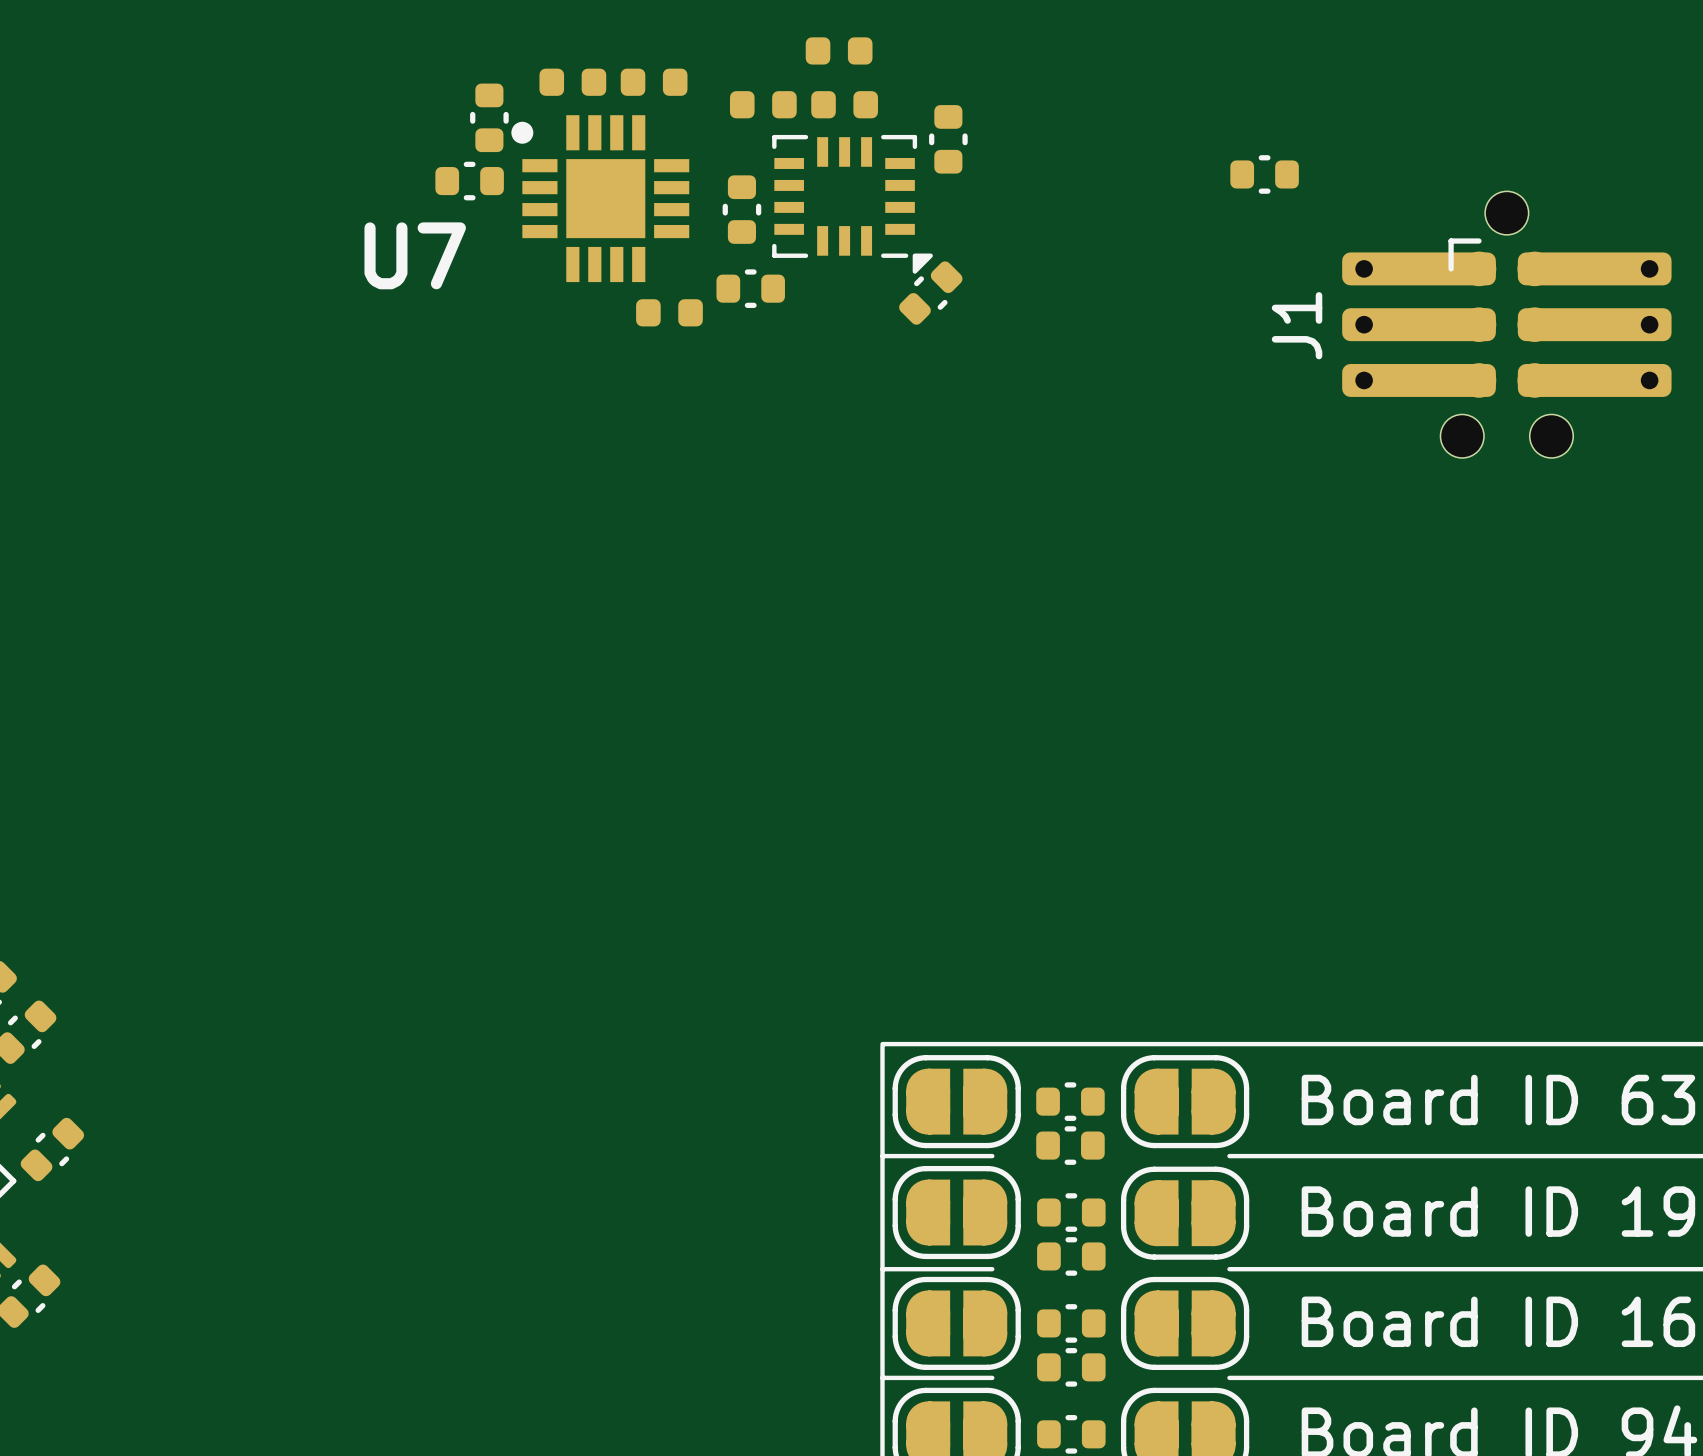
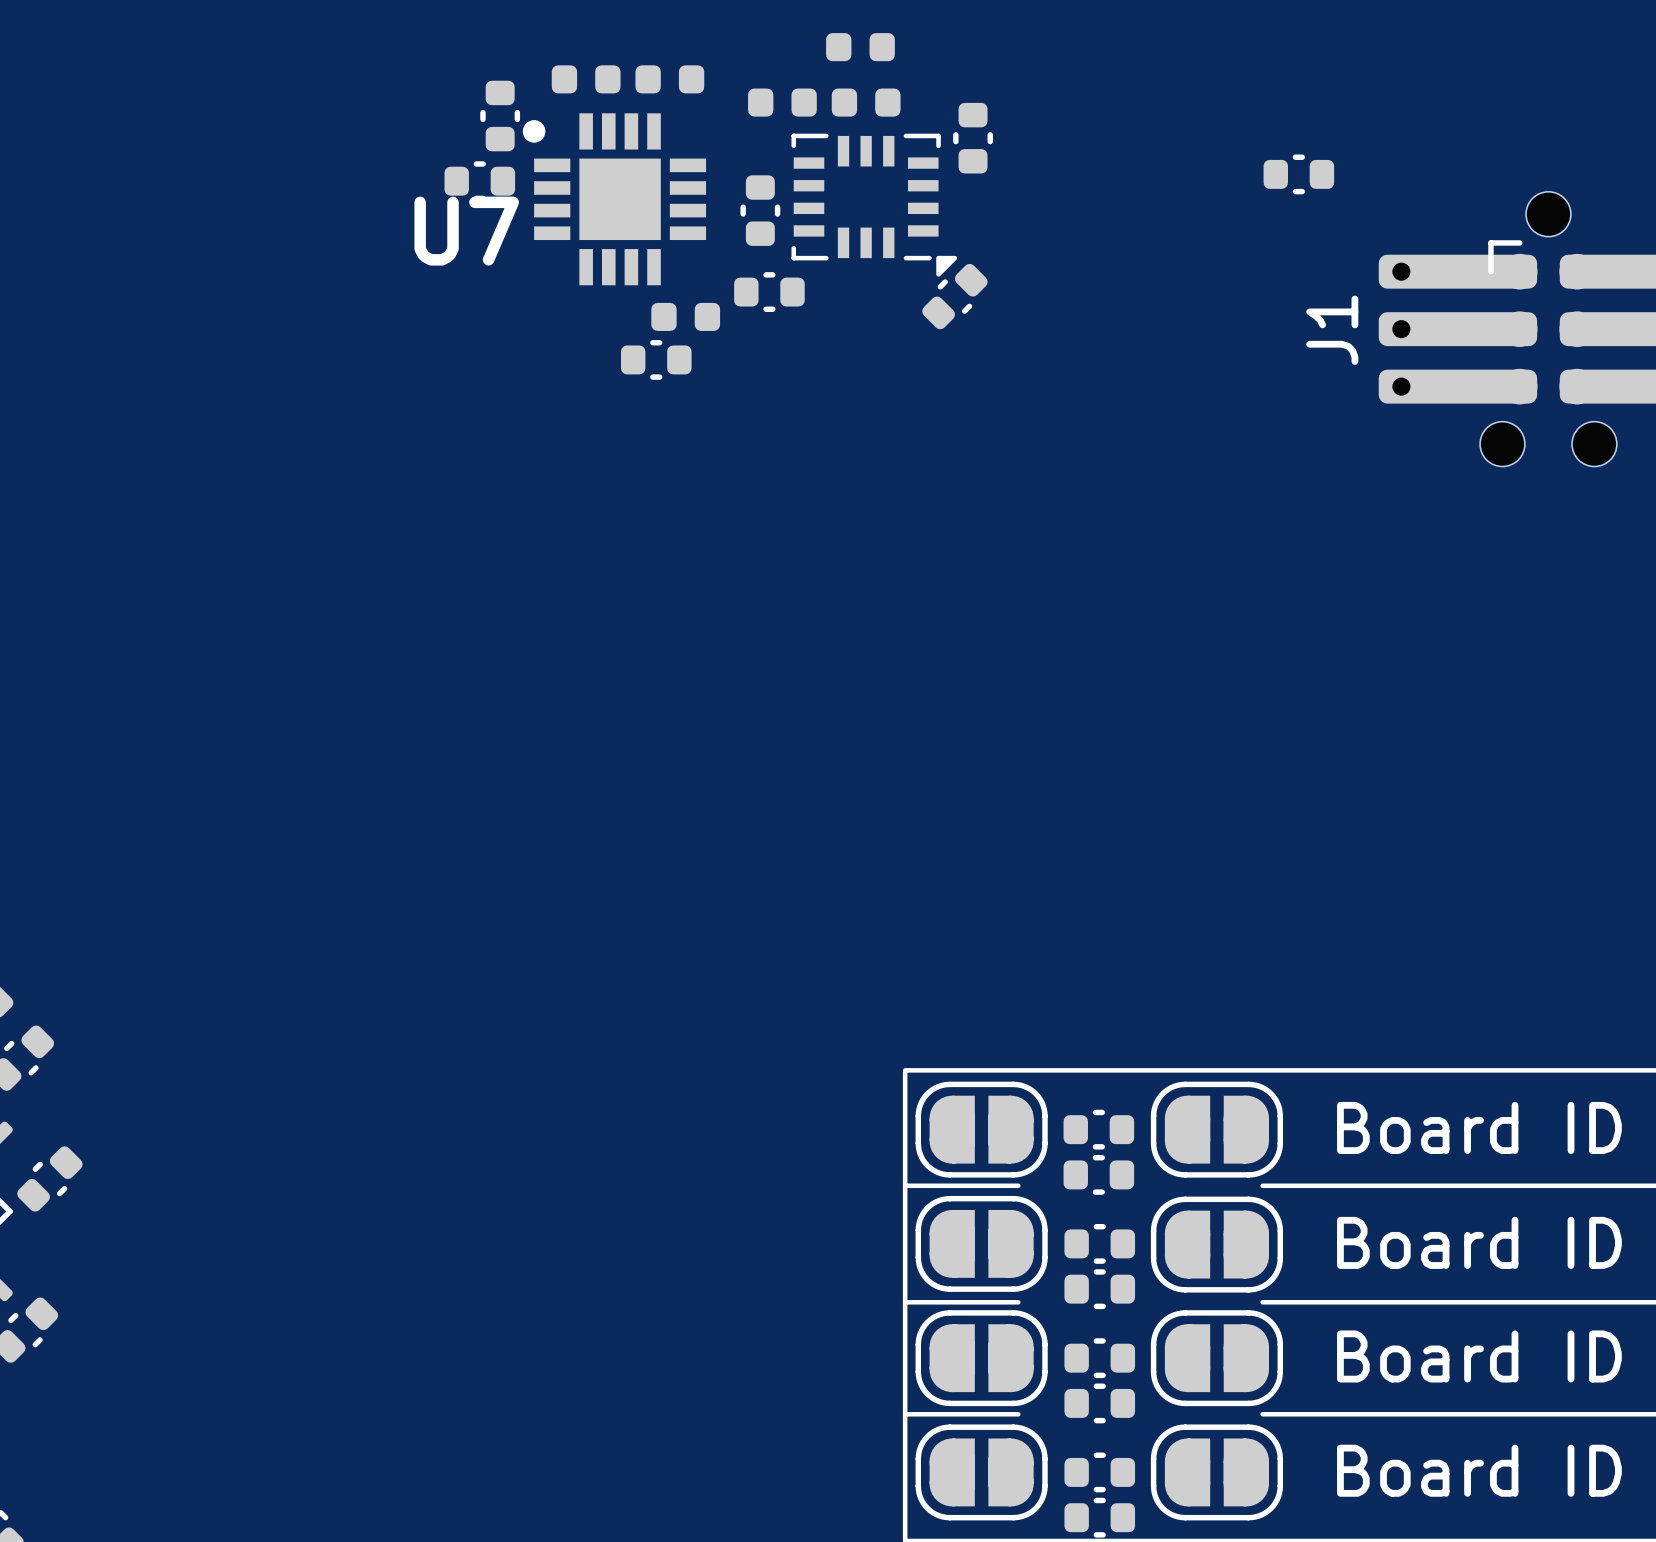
U7 name position: U7 (415, 255) -> U7 (466, 231)
part: none -> (656, 359)

